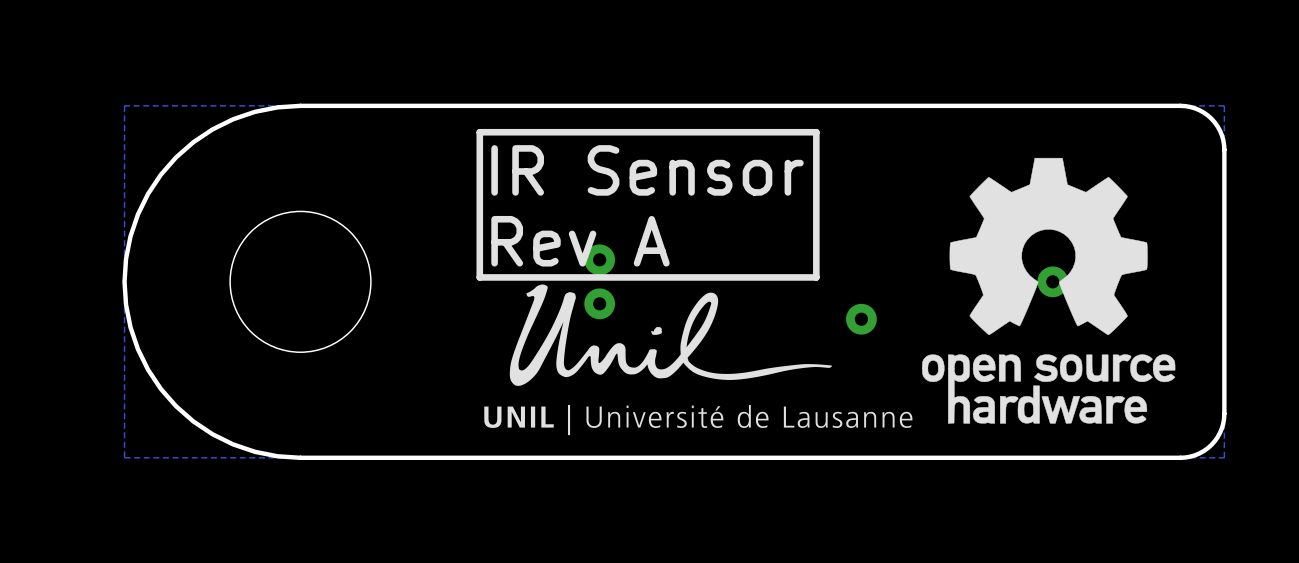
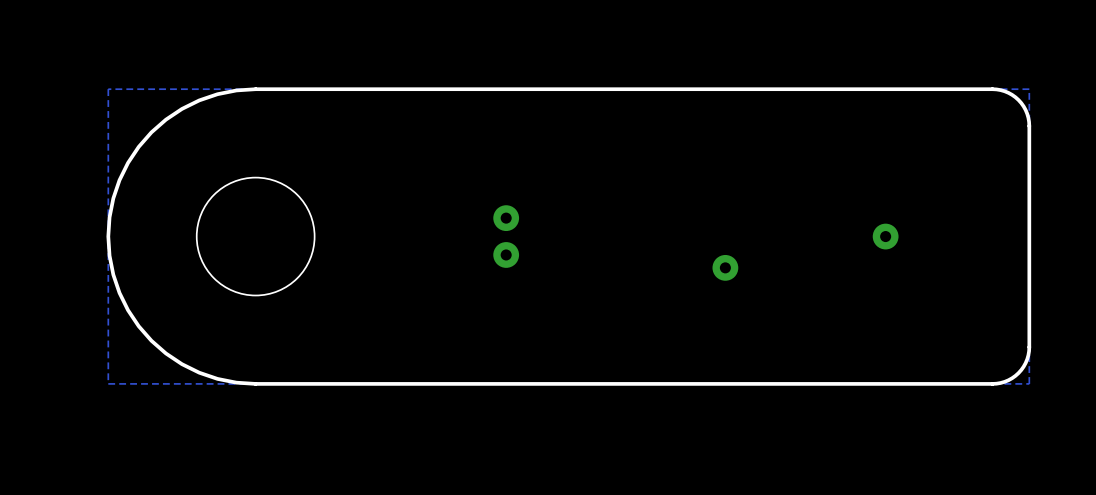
line: (816, 132) (816, 277) (479, 277) (479, 132) (816, 132) -> none
drawing: [484, 157, 1176, 436] -> none
text: IR Sensor (647, 170) -> none
text: Rev A (580, 241) -> none

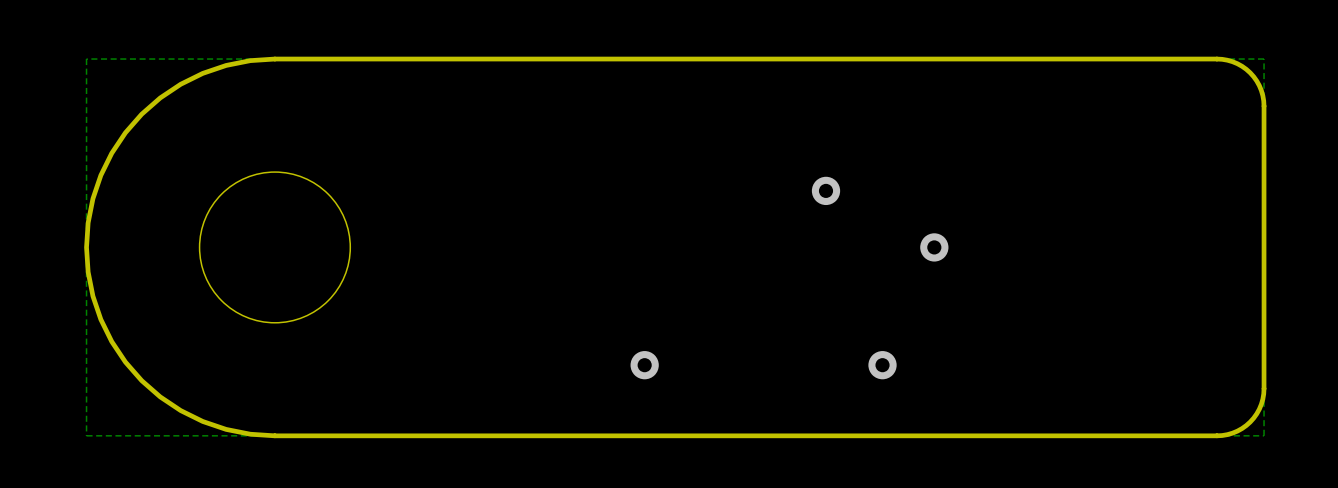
via: none -> (826, 190)
via: (506, 218) -> none
via: none -> (934, 247)
via: (885, 236) -> none
via: (506, 254) -> none
via: (725, 267) -> none
via: none -> (644, 365)
via: none -> (882, 365)

